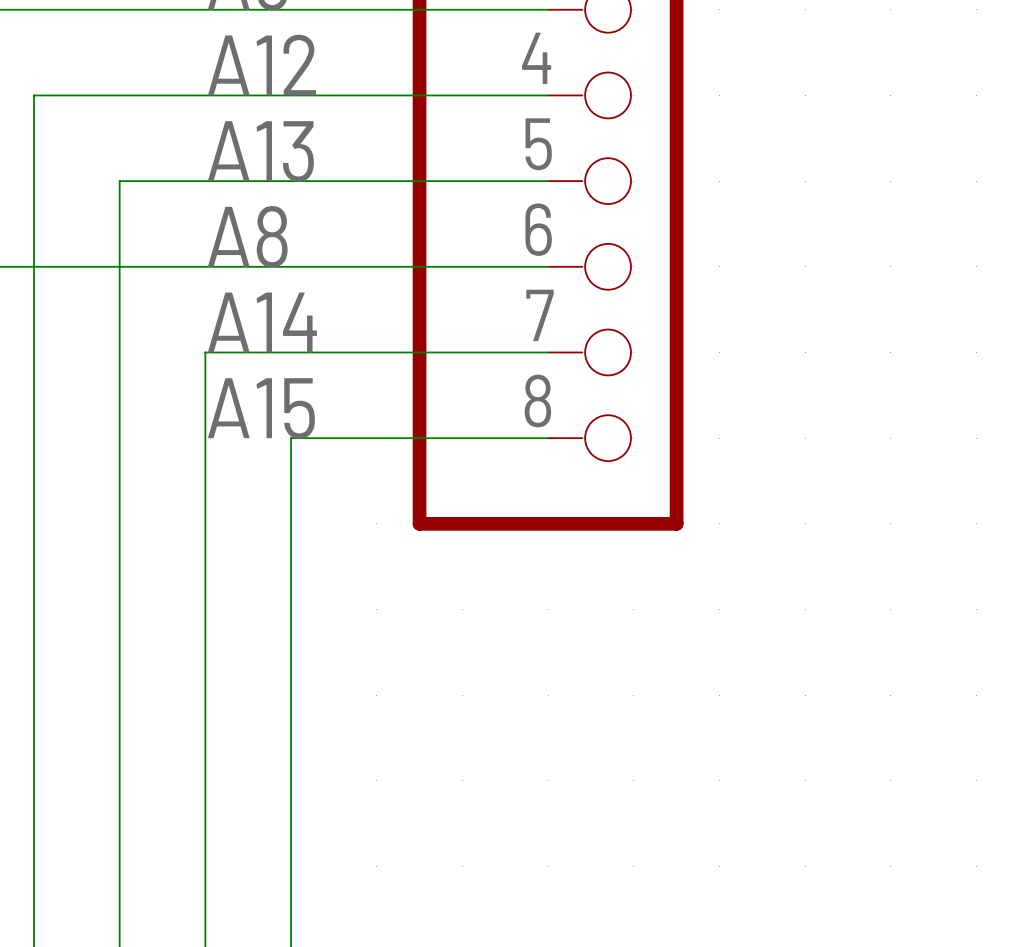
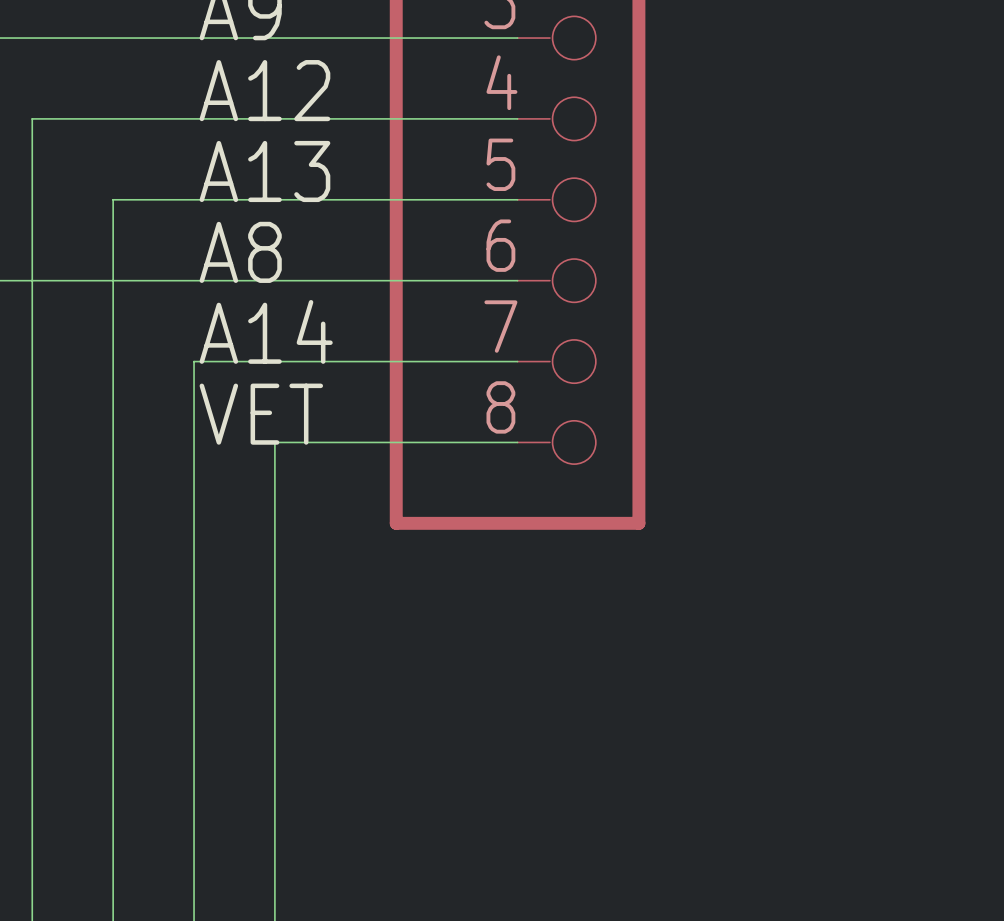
label: A15 (261, 408) -> VET (261, 414)

